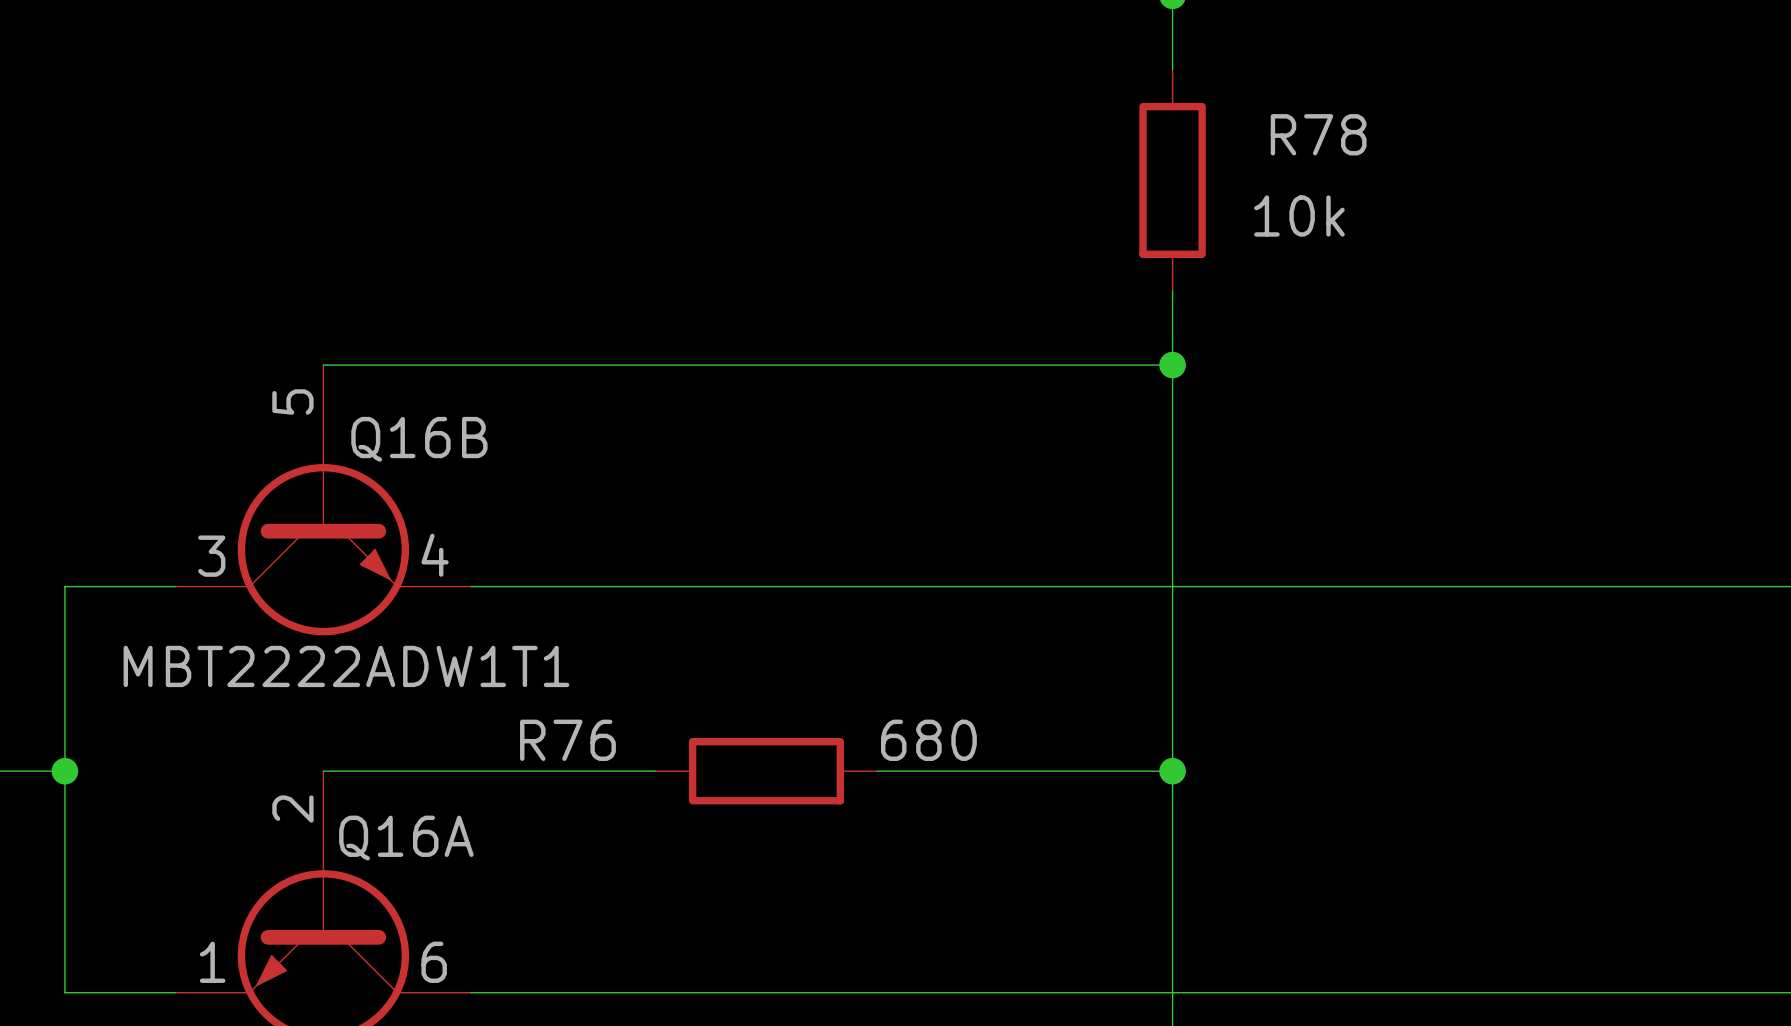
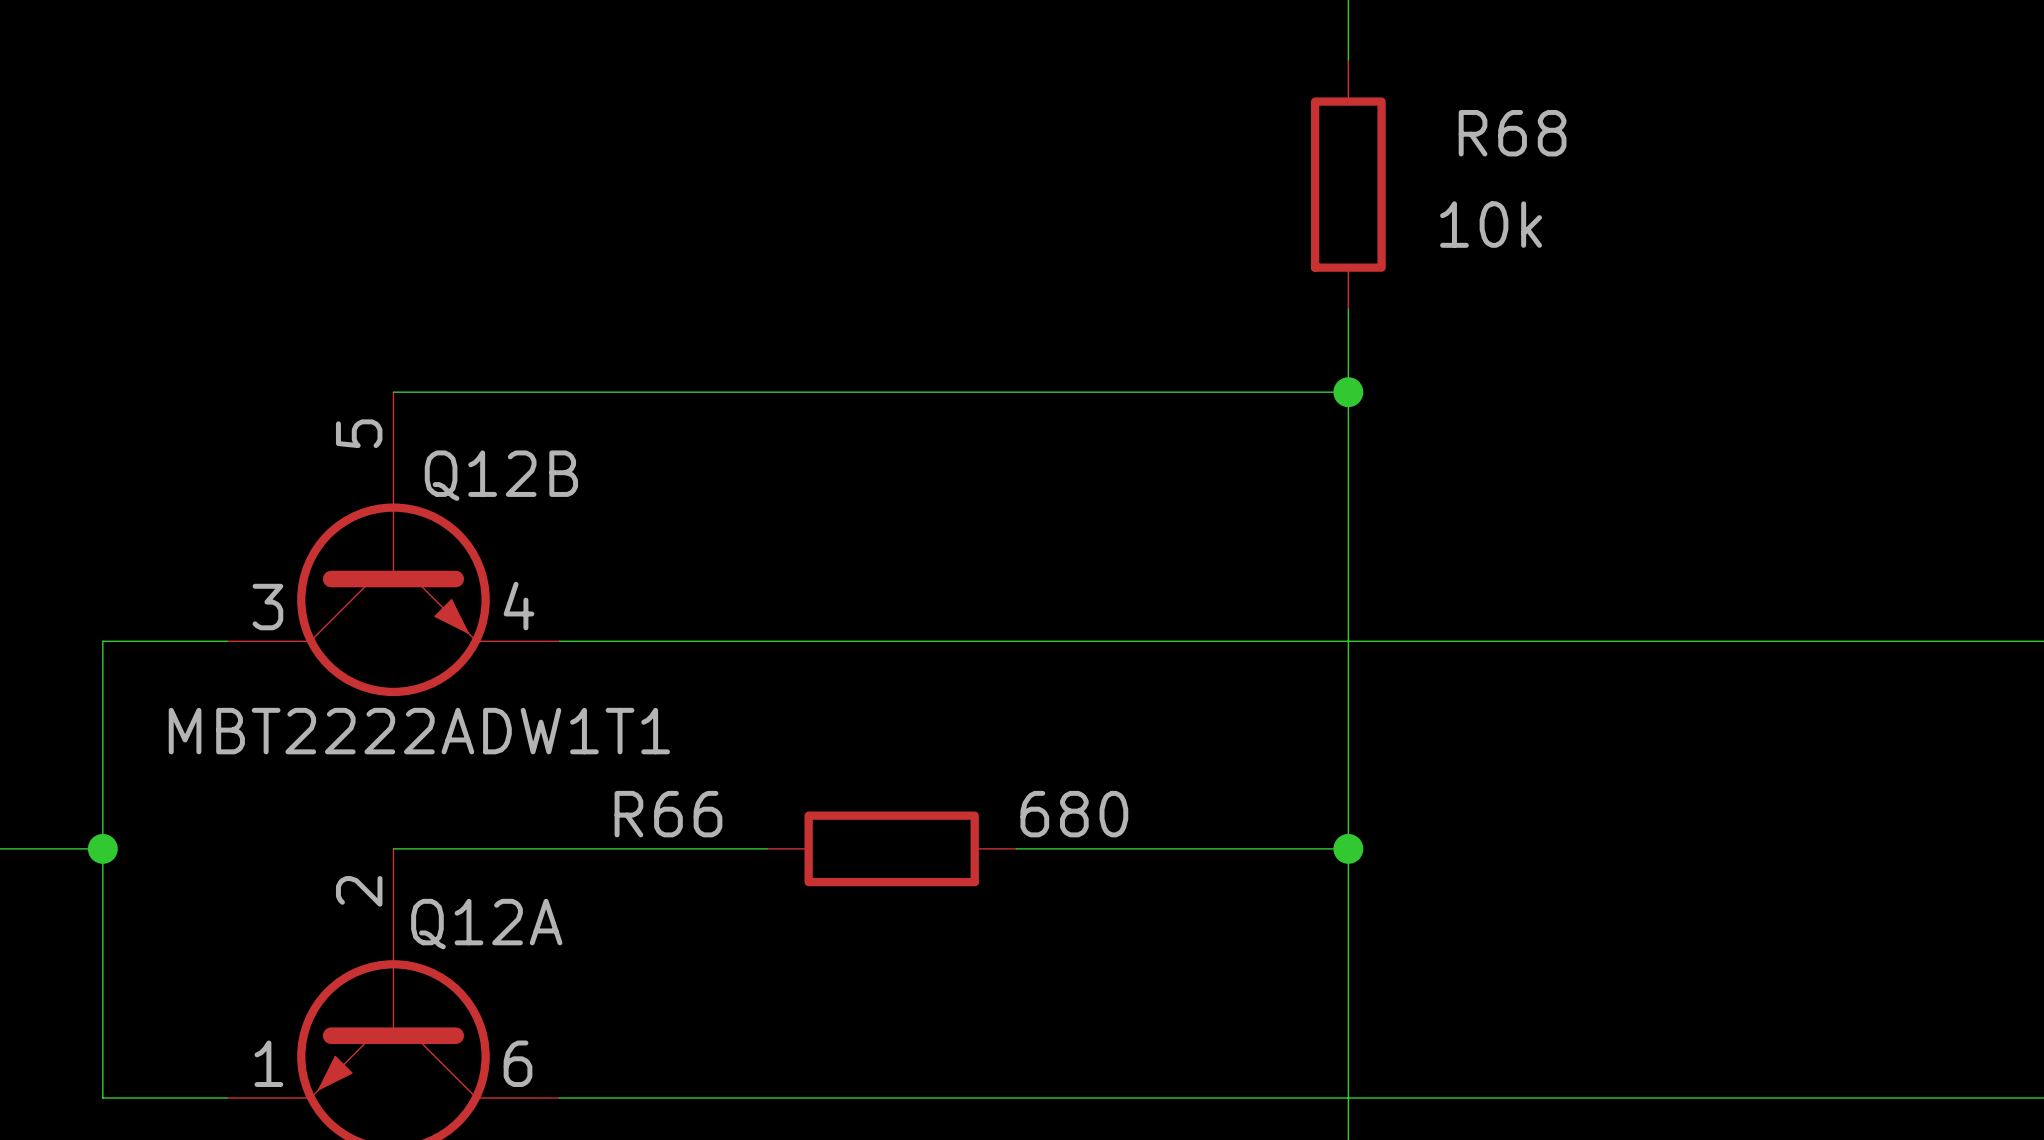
R78 name: R78 (1318, 134) -> R68 (1512, 133)
Q16B name: Q16B (419, 439) -> Q12B (501, 475)
R76 name: R76 (567, 740) -> R66 (668, 814)
Q16A name: Q16A (406, 838) -> Q12A (486, 924)

